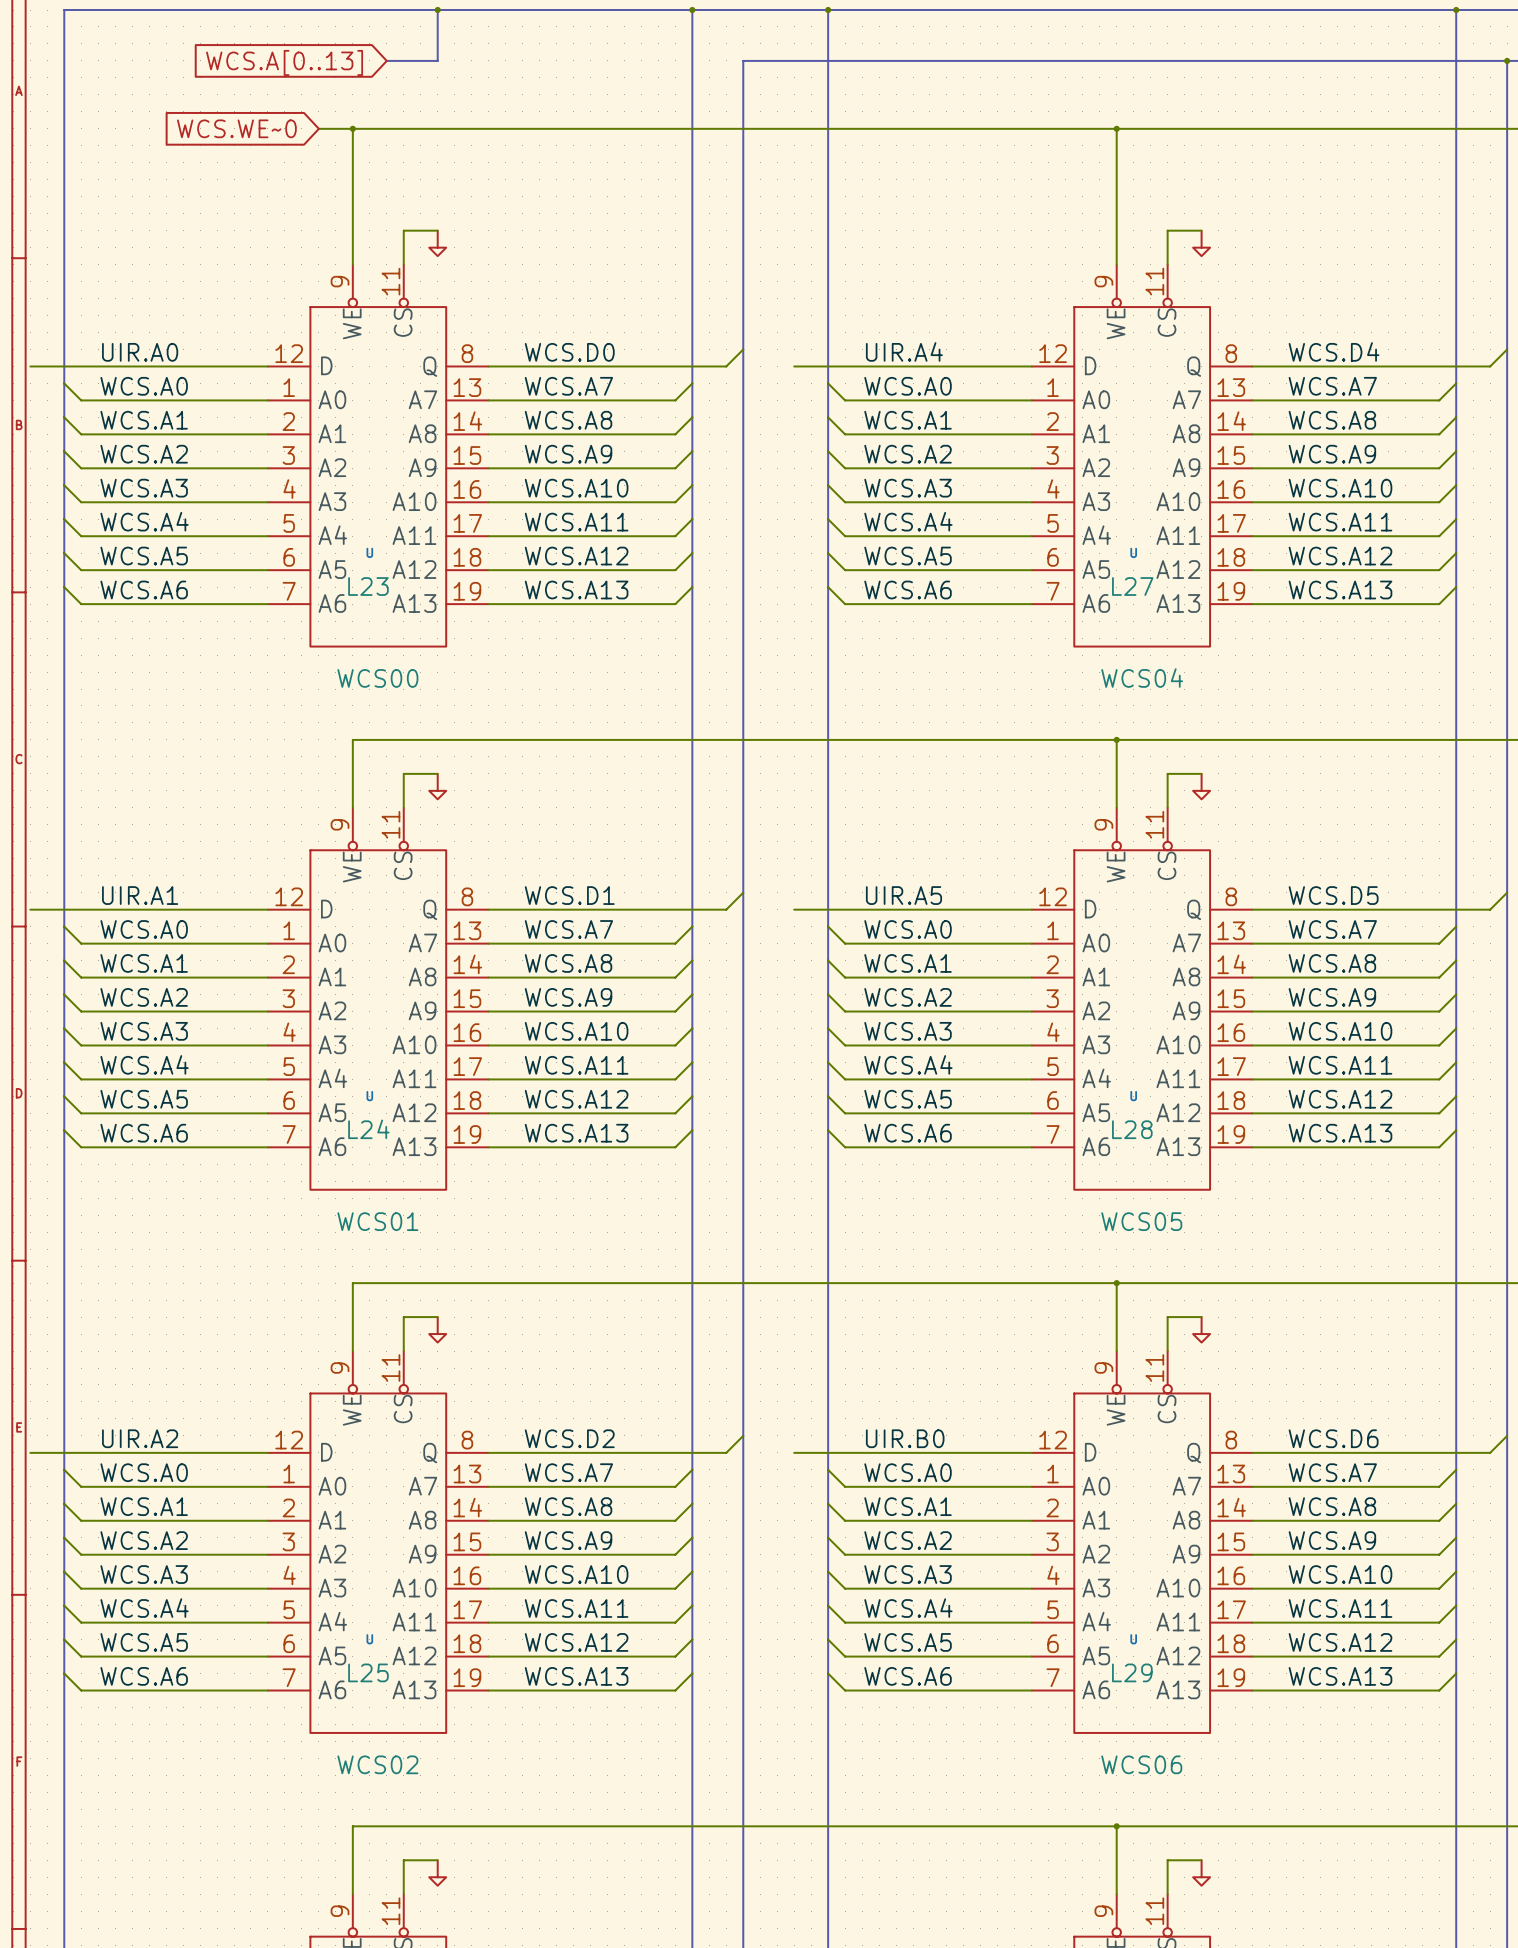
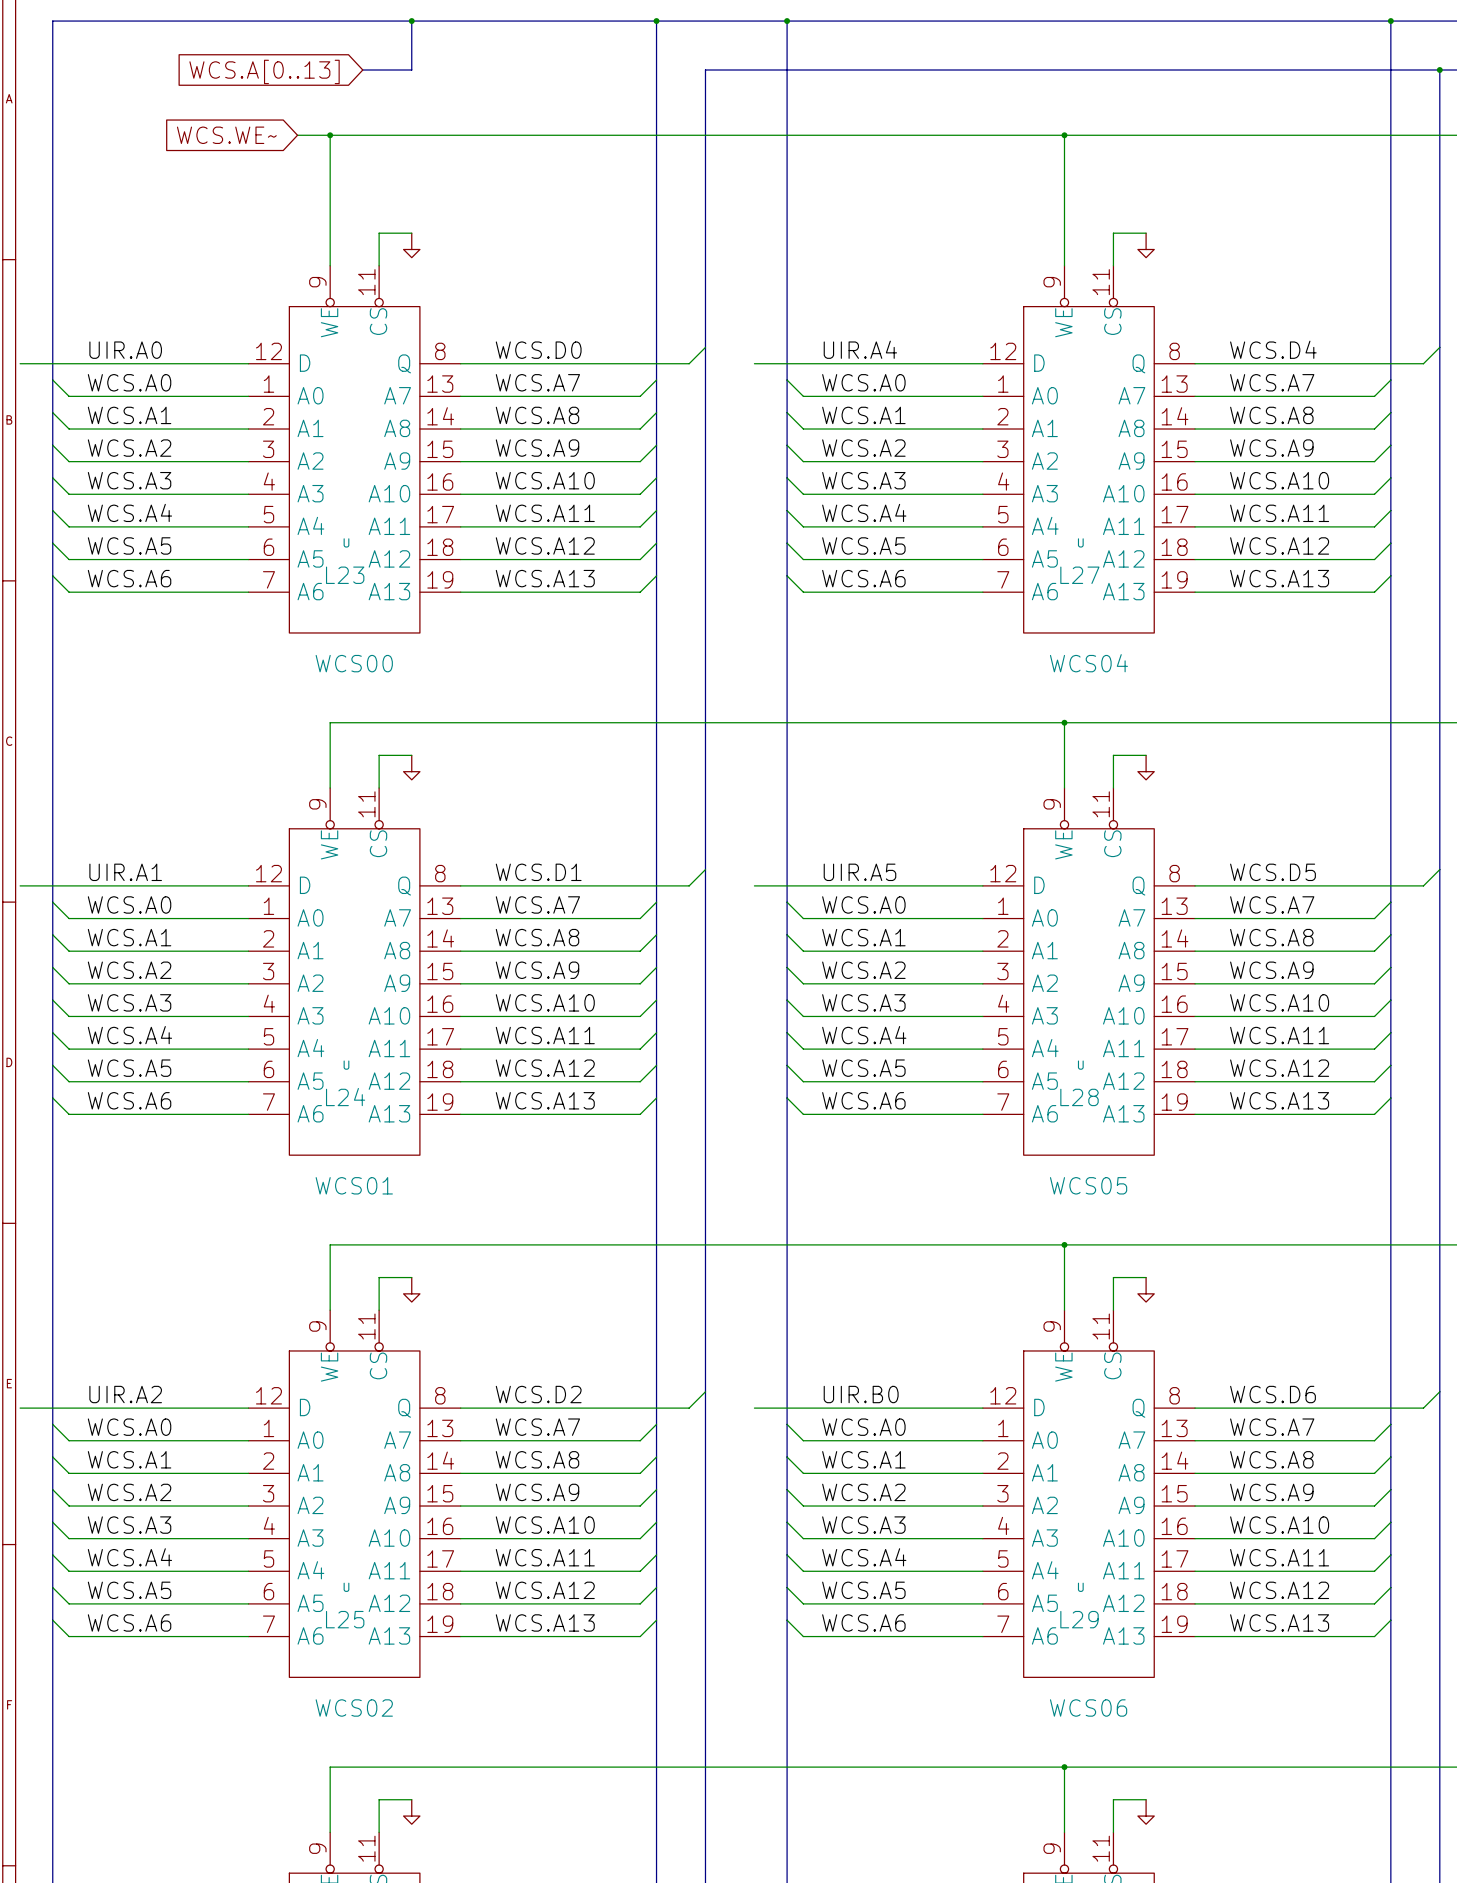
global label: WCS.WE~0 (236, 128) -> WCS.WE~ (226, 135)

